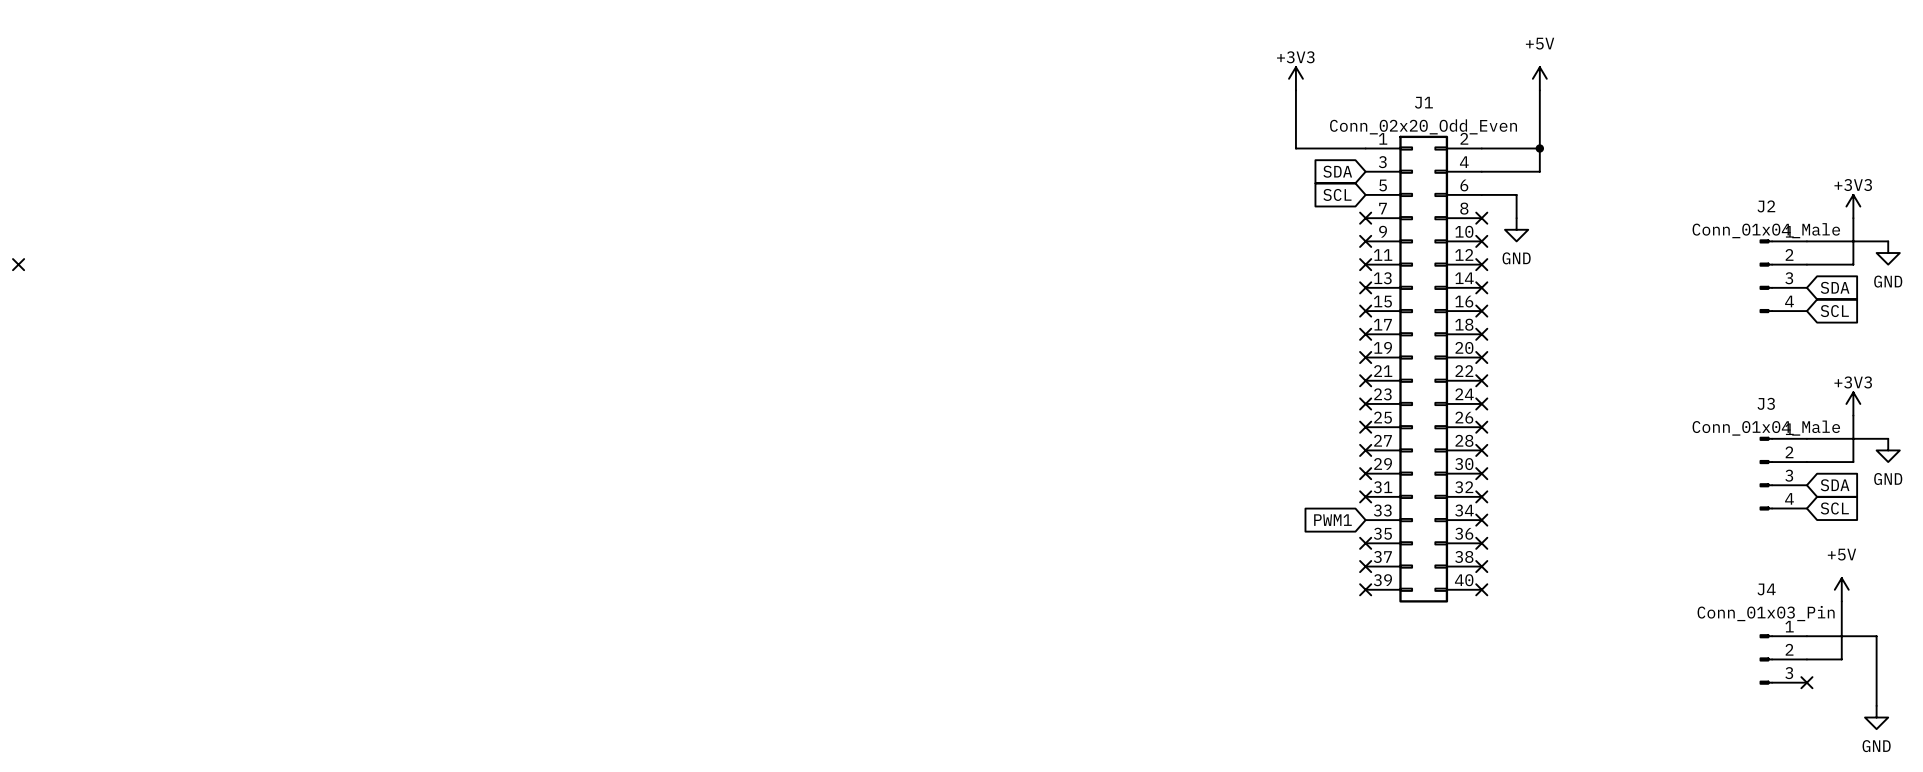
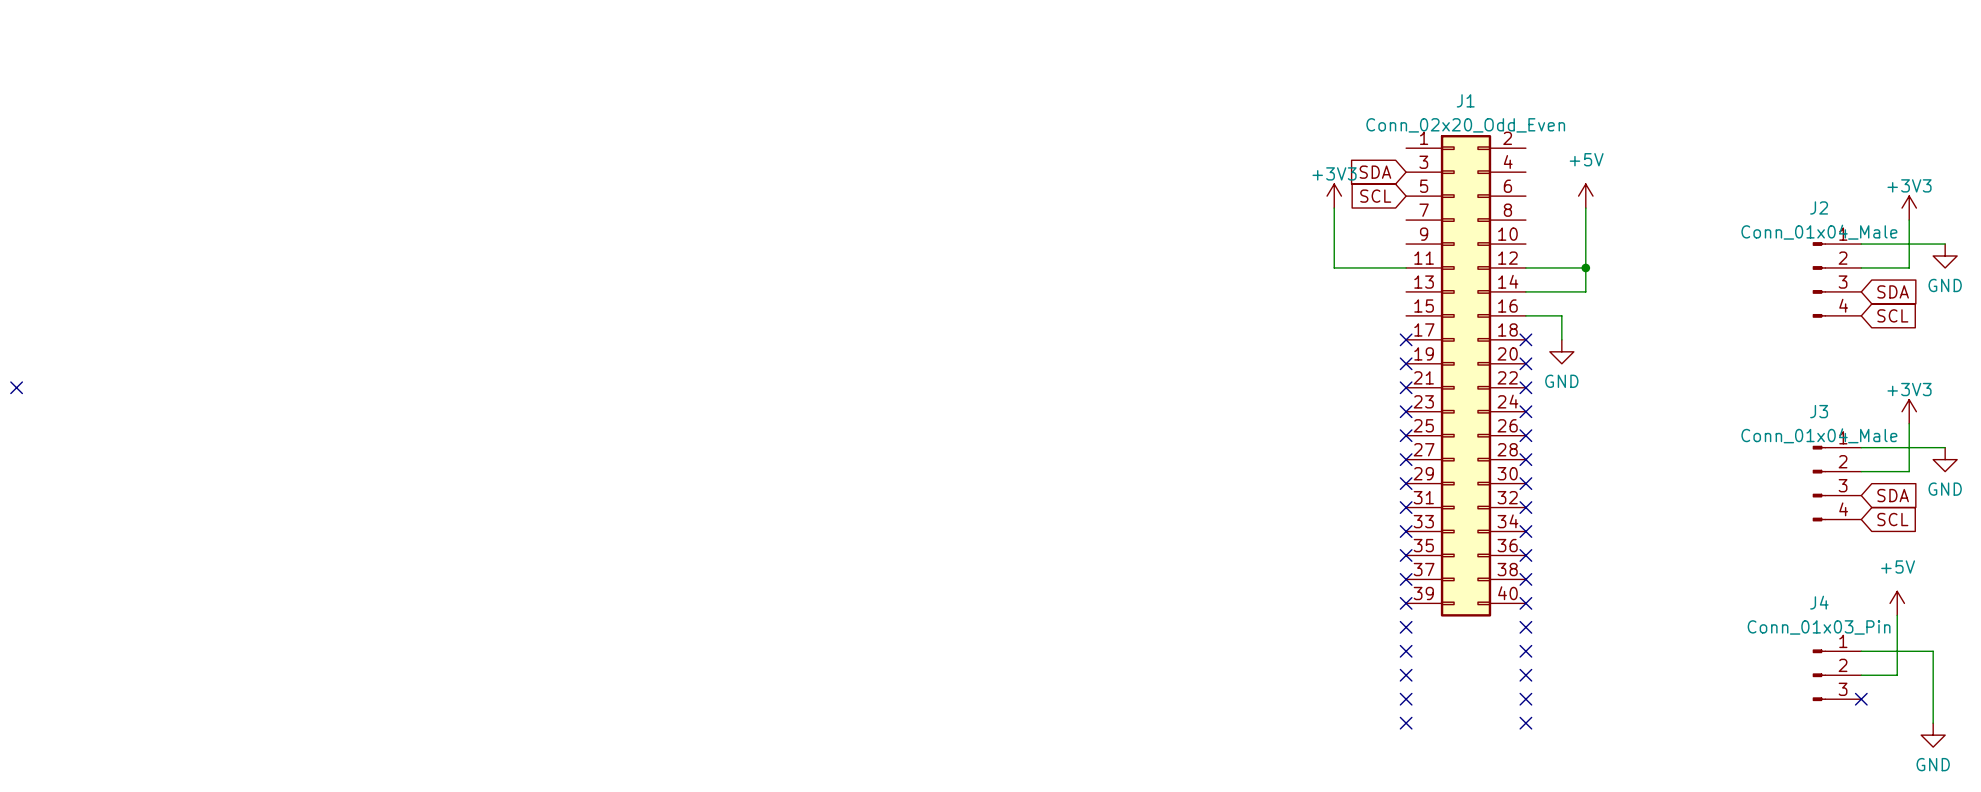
power symbol position: +3V3 (1295, 78) -> +3V3 (1334, 196)
power symbol position: +5V (1539, 78) -> +5V (1585, 196)
wire: (1295, 90) (1295, 148) (1365, 148) -> (1334, 208) (1334, 267) (1406, 267)
wire: (1539, 90) (1539, 171) (1481, 171) -> (1585, 208) (1585, 291) (1525, 291)
wire: (1481, 148) (1539, 148) -> (1525, 267) (1585, 267)
junction: (1539, 148) -> none
wire: (1481, 194) (1516, 194) (1516, 218) -> (1525, 315) (1561, 315) (1561, 339)
no-connect mark: (1365, 218) -> none
no-connect mark: (1481, 218) -> none
power symbol position: GND (1516, 229) -> GND (1561, 351)
no-connect mark: (1365, 241) -> none
no-connect mark: (1481, 241) -> none
no-connect mark: (18, 264) -> none
no-connect mark: (1365, 264) -> none
no-connect mark: (1481, 264) -> none
junction: none -> (1585, 267)
no-connect mark: (1365, 287) -> none
no-connect mark: (1481, 287) -> none
no-connect mark: (1365, 311) -> none
no-connect mark: (1481, 311) -> none
no-connect mark: none -> (16, 387)
global label: PWM1 (1332, 520) -> none
no-connect mark: none -> (1406, 531)
no-connect mark: none -> (1406, 627)
no-connect mark: none -> (1525, 627)
no-connect mark: none -> (1406, 651)
no-connect mark: none -> (1525, 651)
no-connect mark: none -> (1406, 675)
no-connect mark: none -> (1525, 675)
no-connect mark: none -> (1406, 699)
no-connect mark: none -> (1525, 699)
no-connect mark: none -> (1406, 723)
no-connect mark: none -> (1525, 723)

